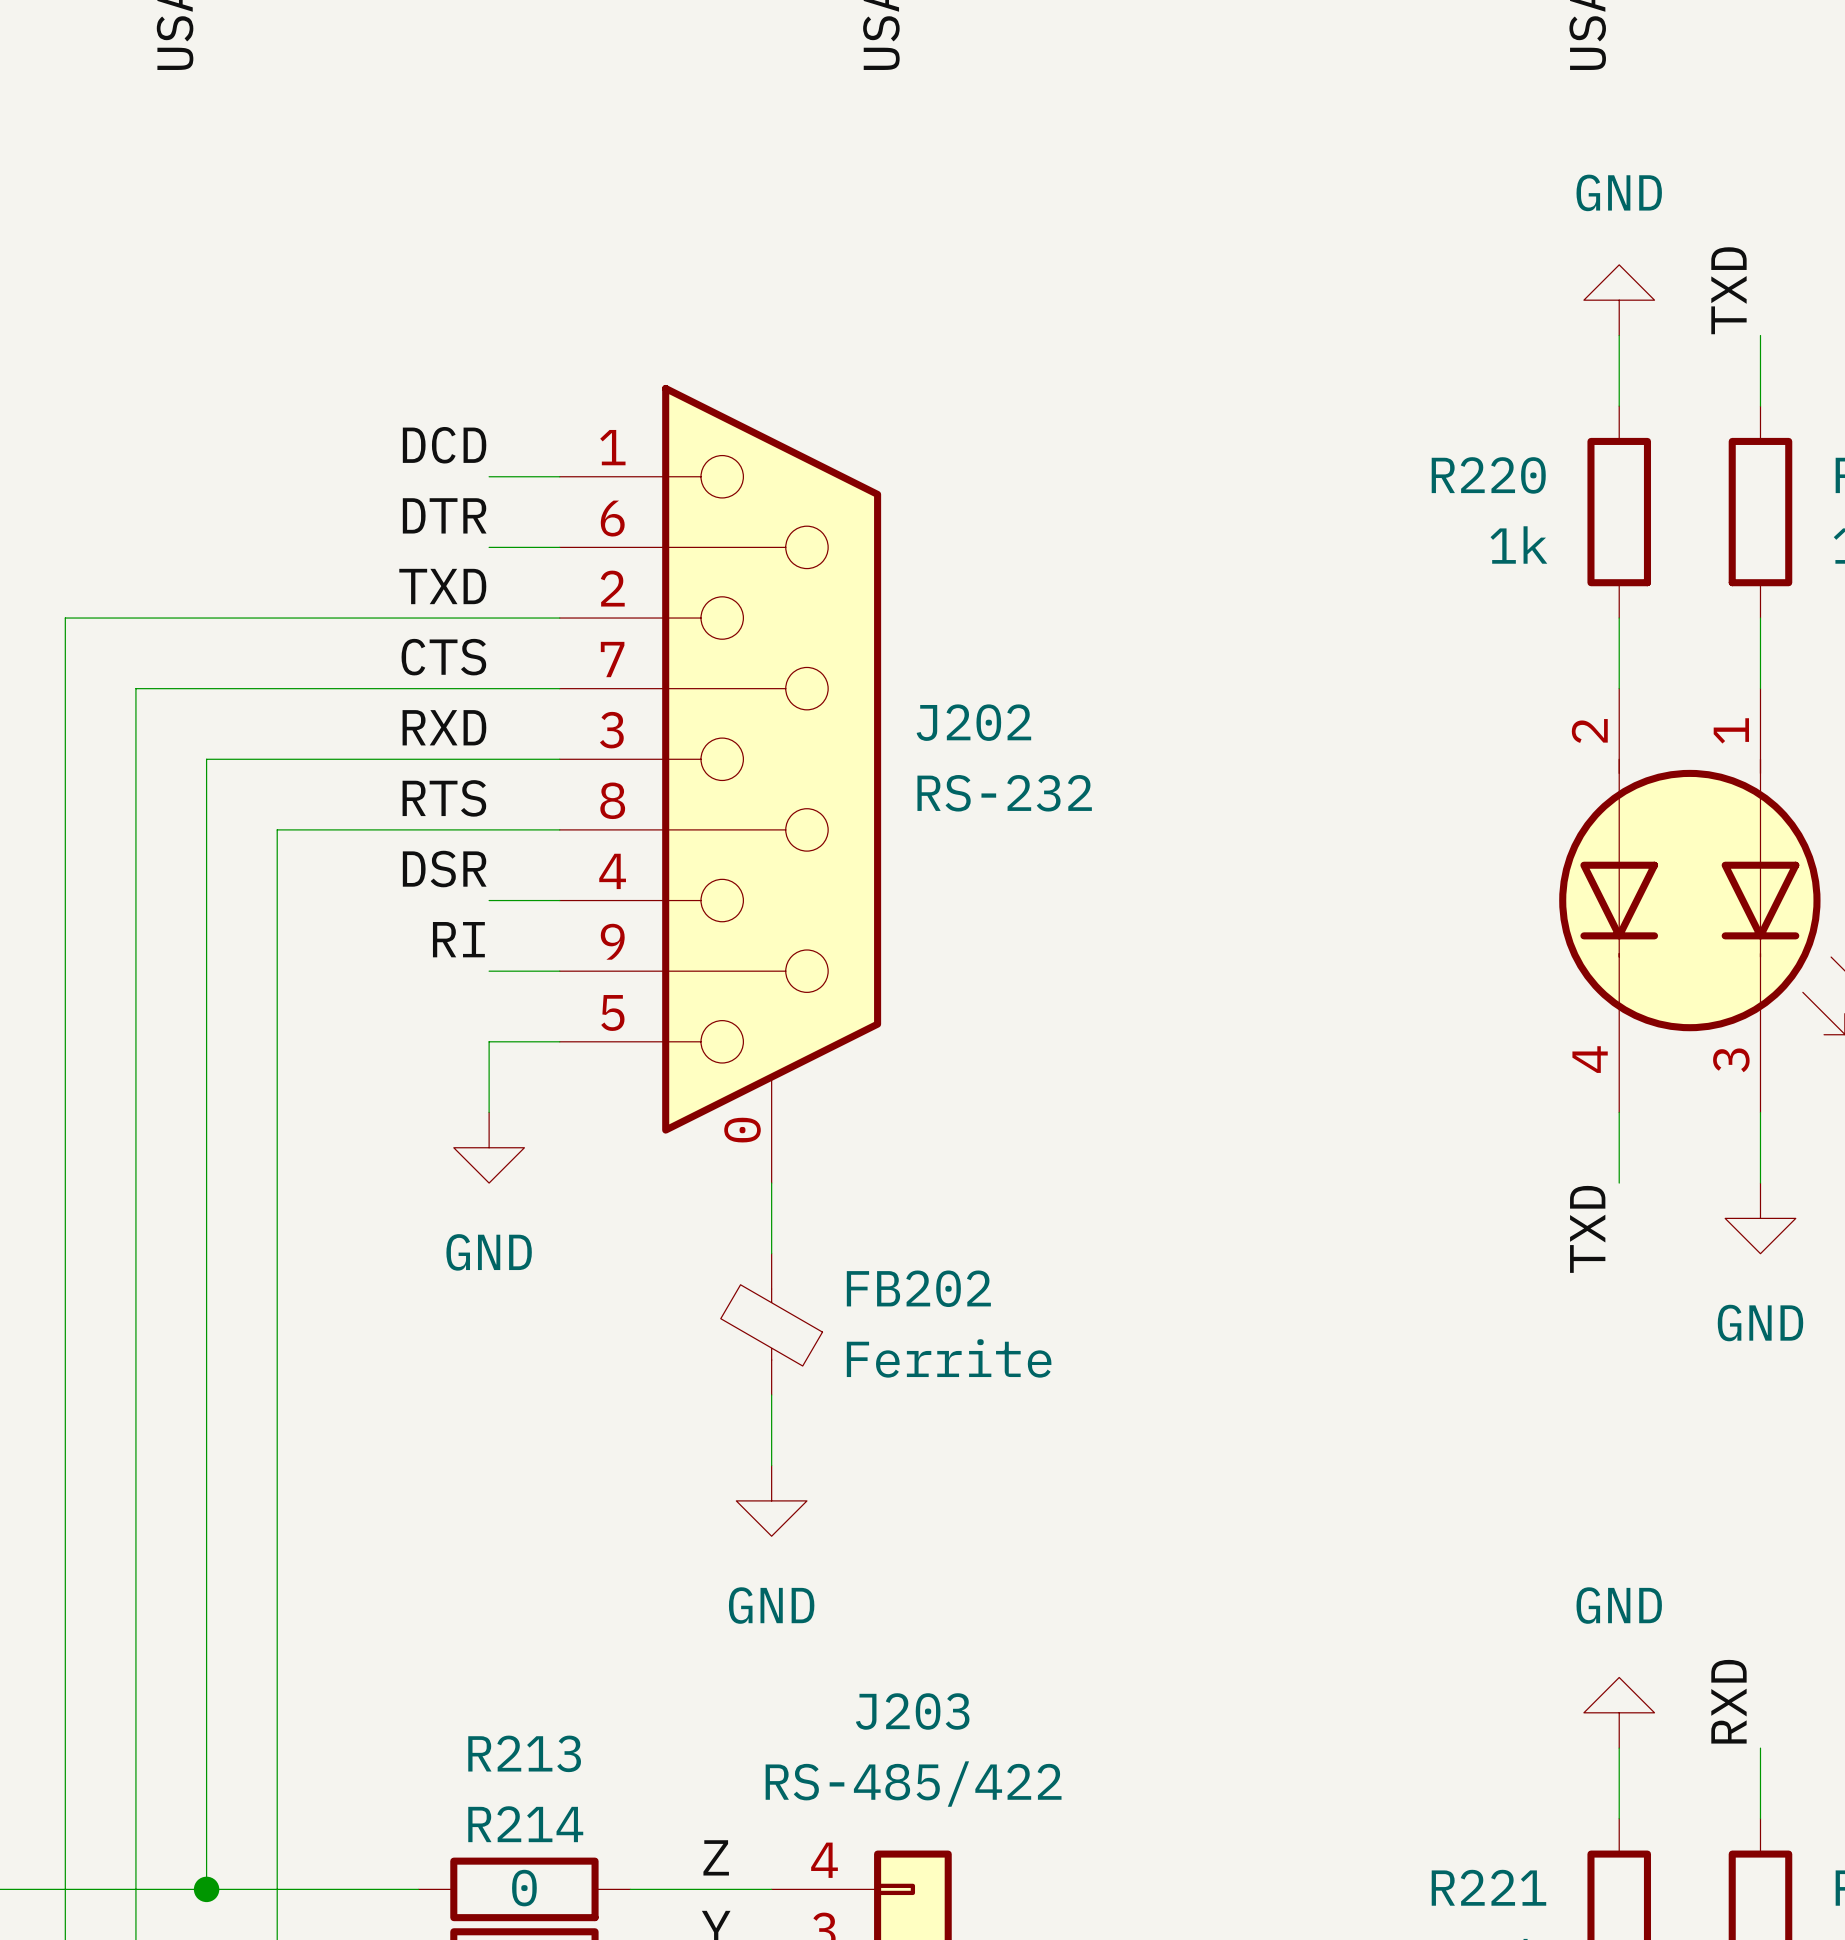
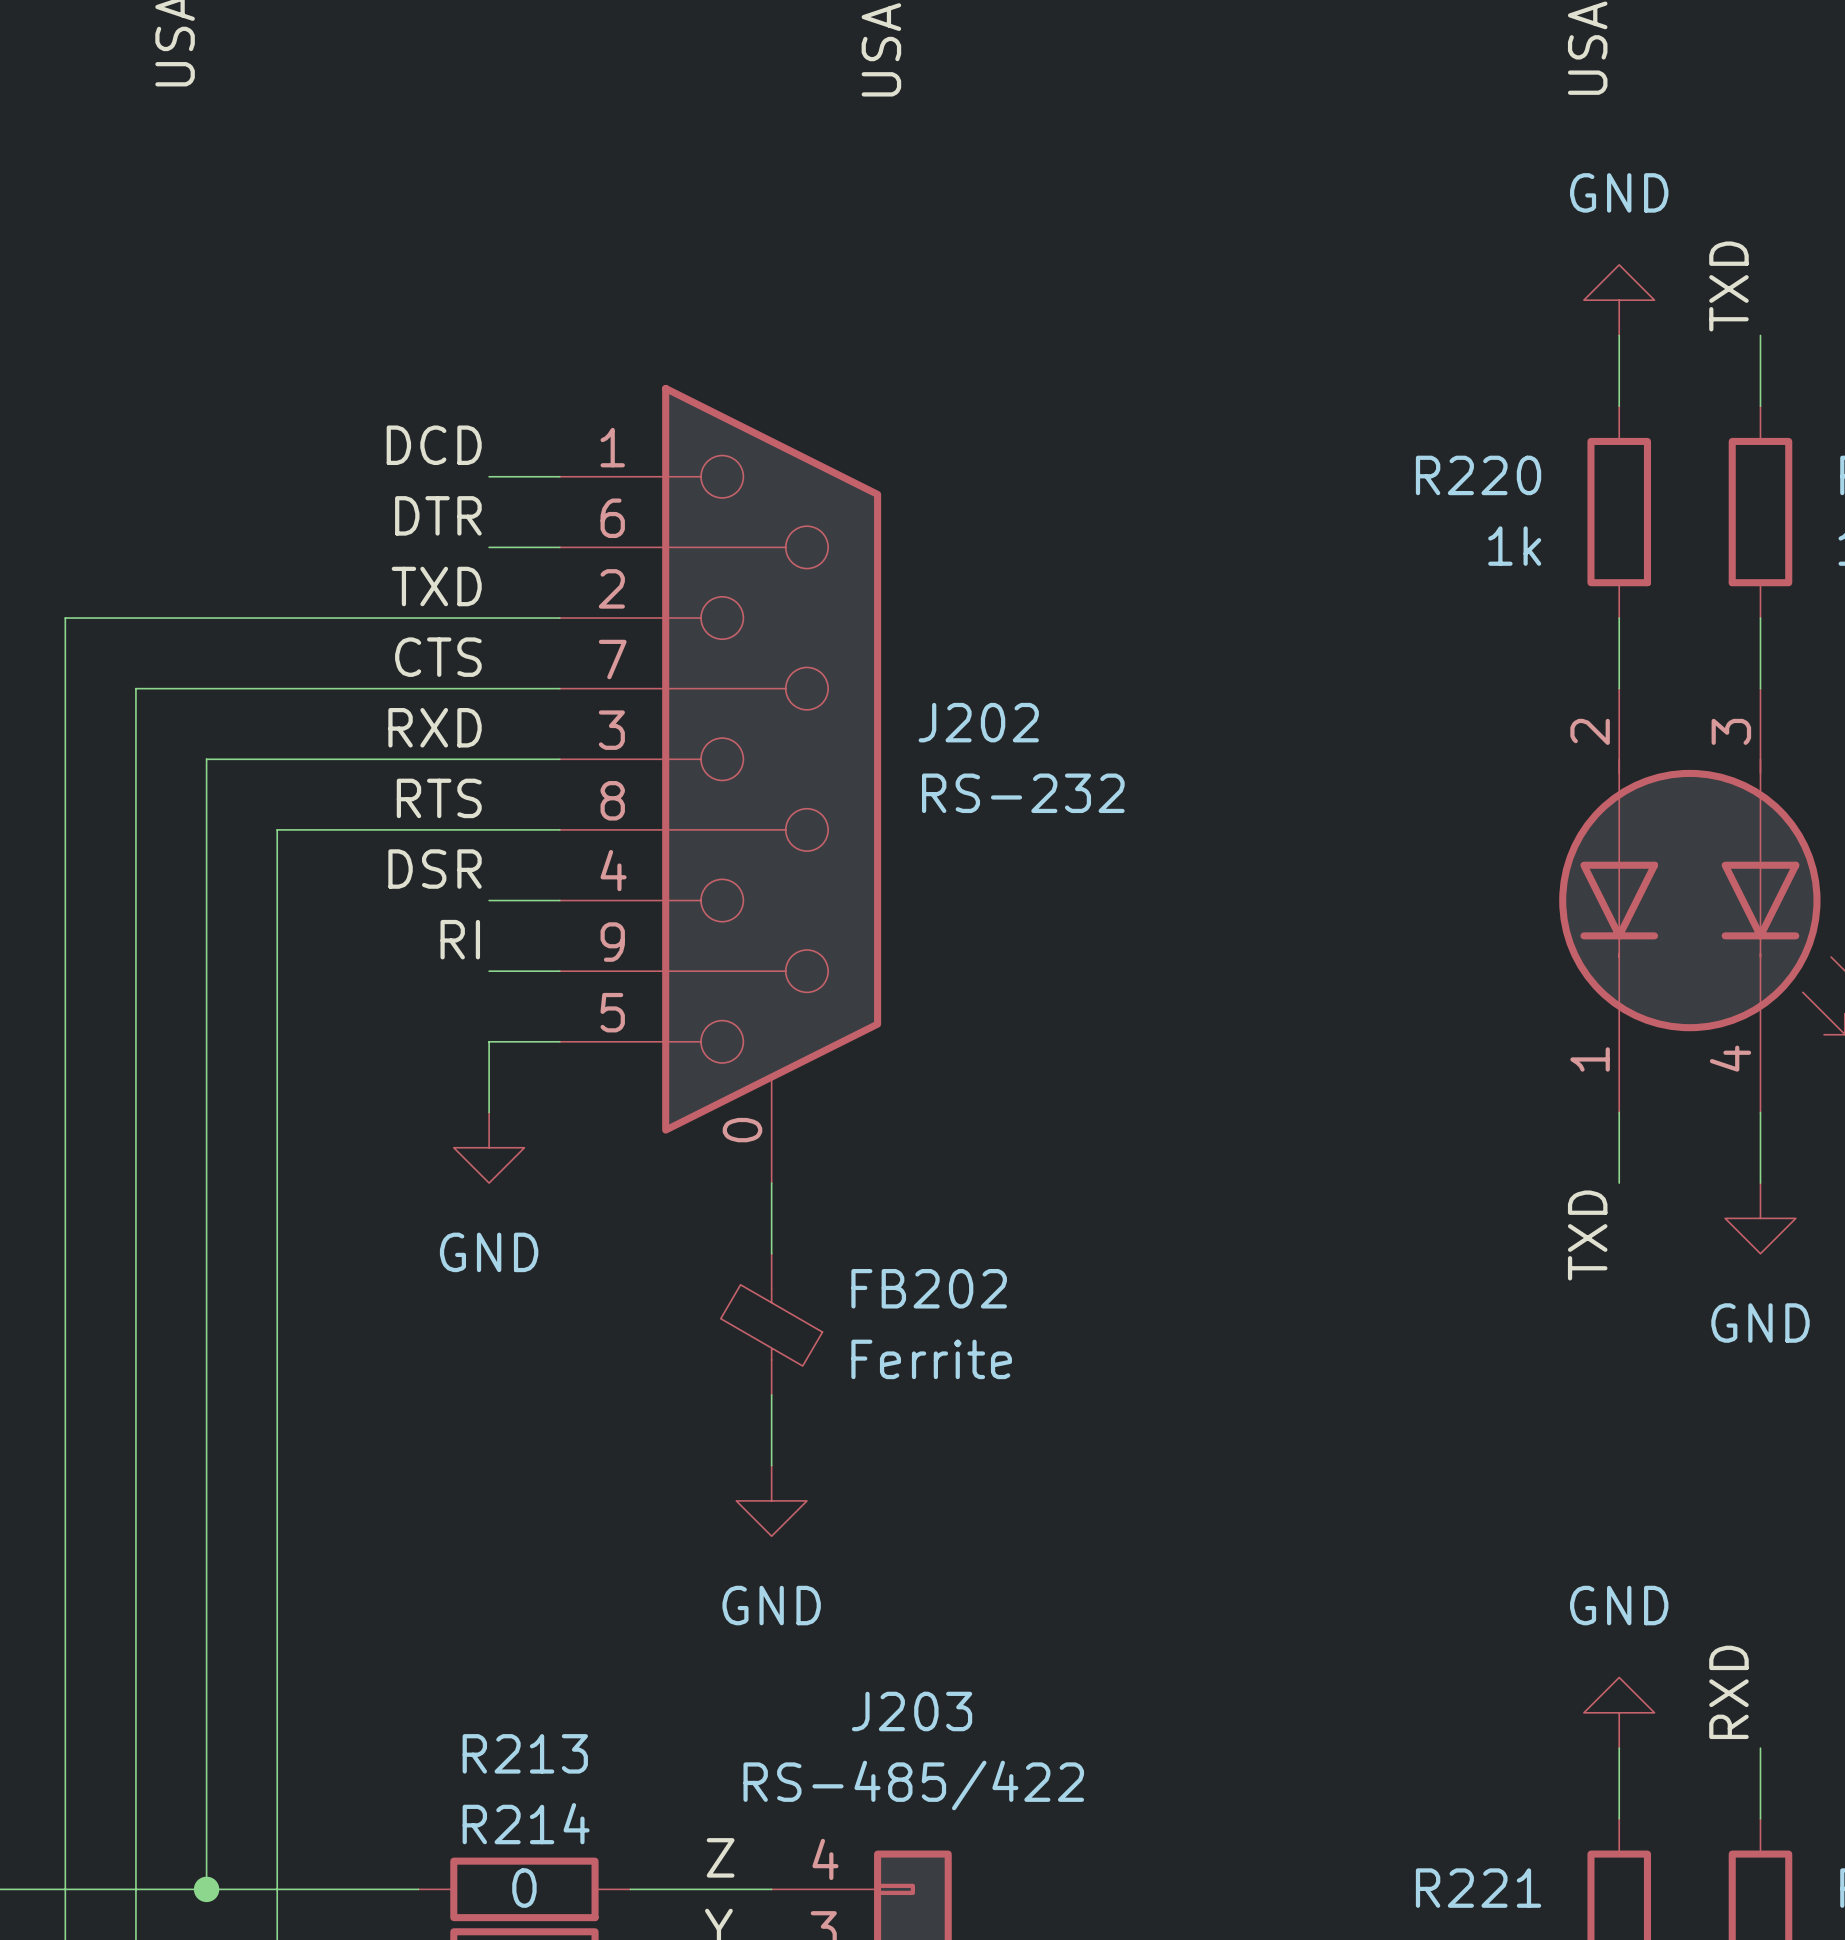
part pin number: 1 (1731, 730) -> 3 (1731, 731)
part pin number: 4 (1590, 1059) -> 1 (1590, 1059)
part pin number: 3 (1731, 1060) -> 4 (1730, 1058)

